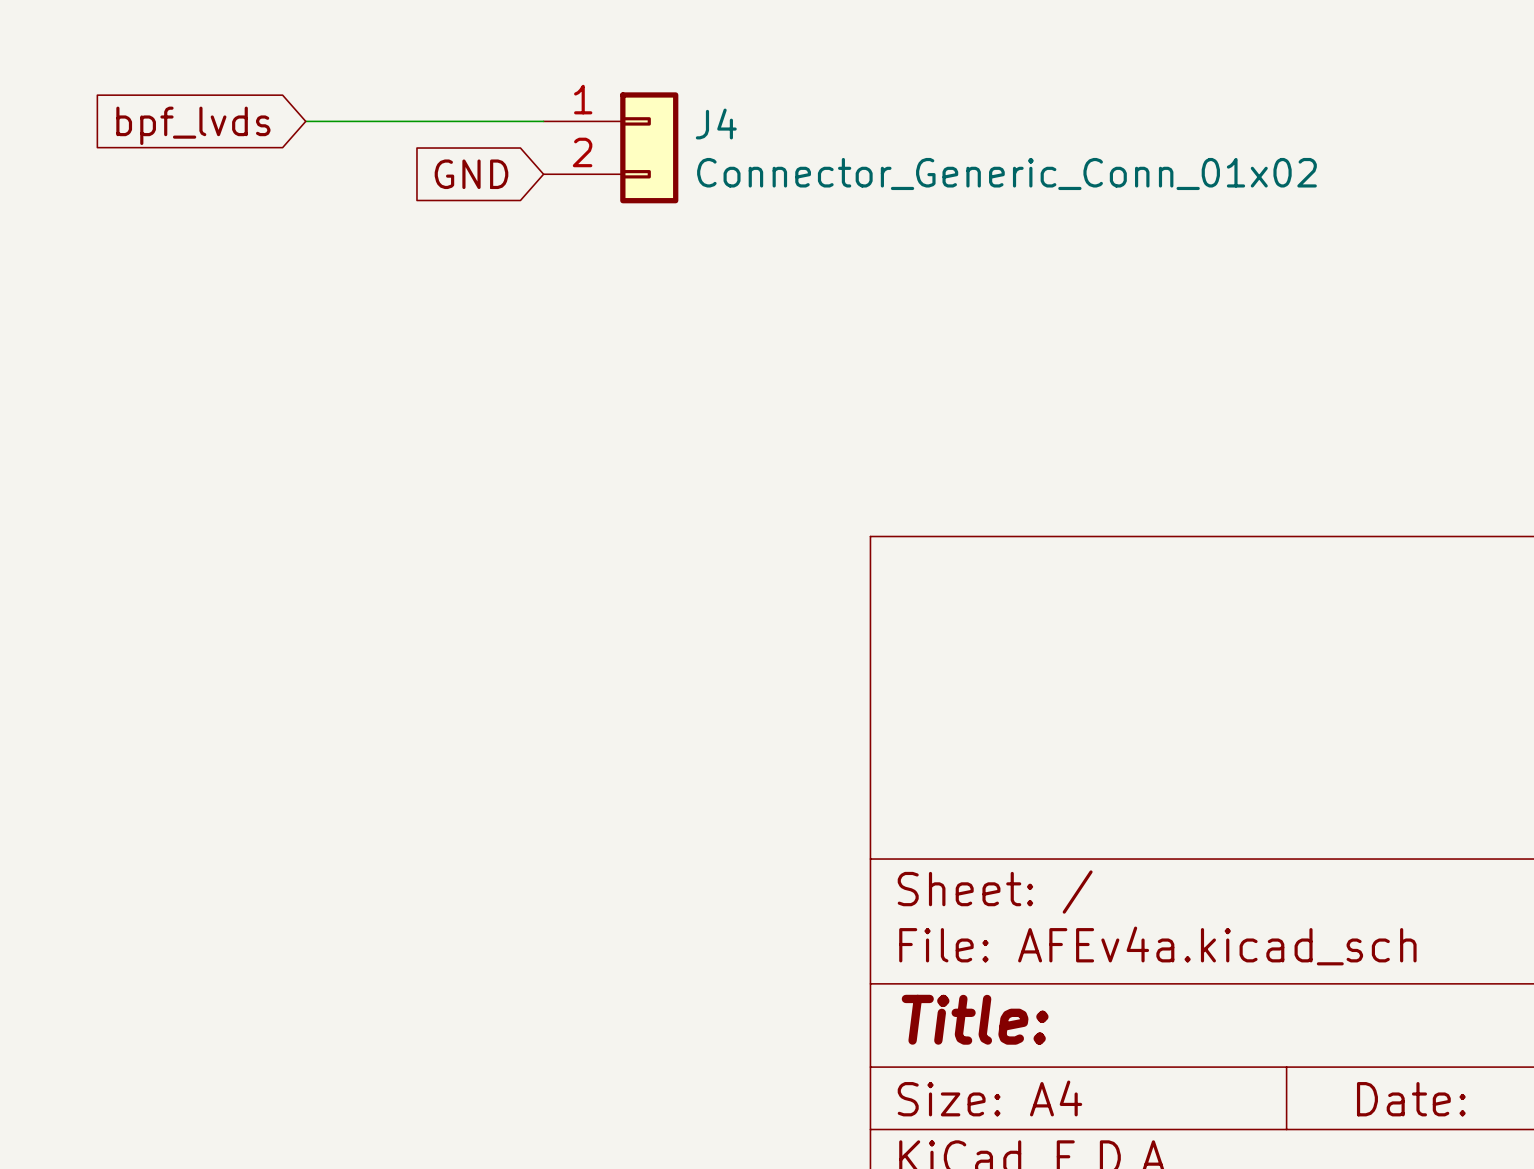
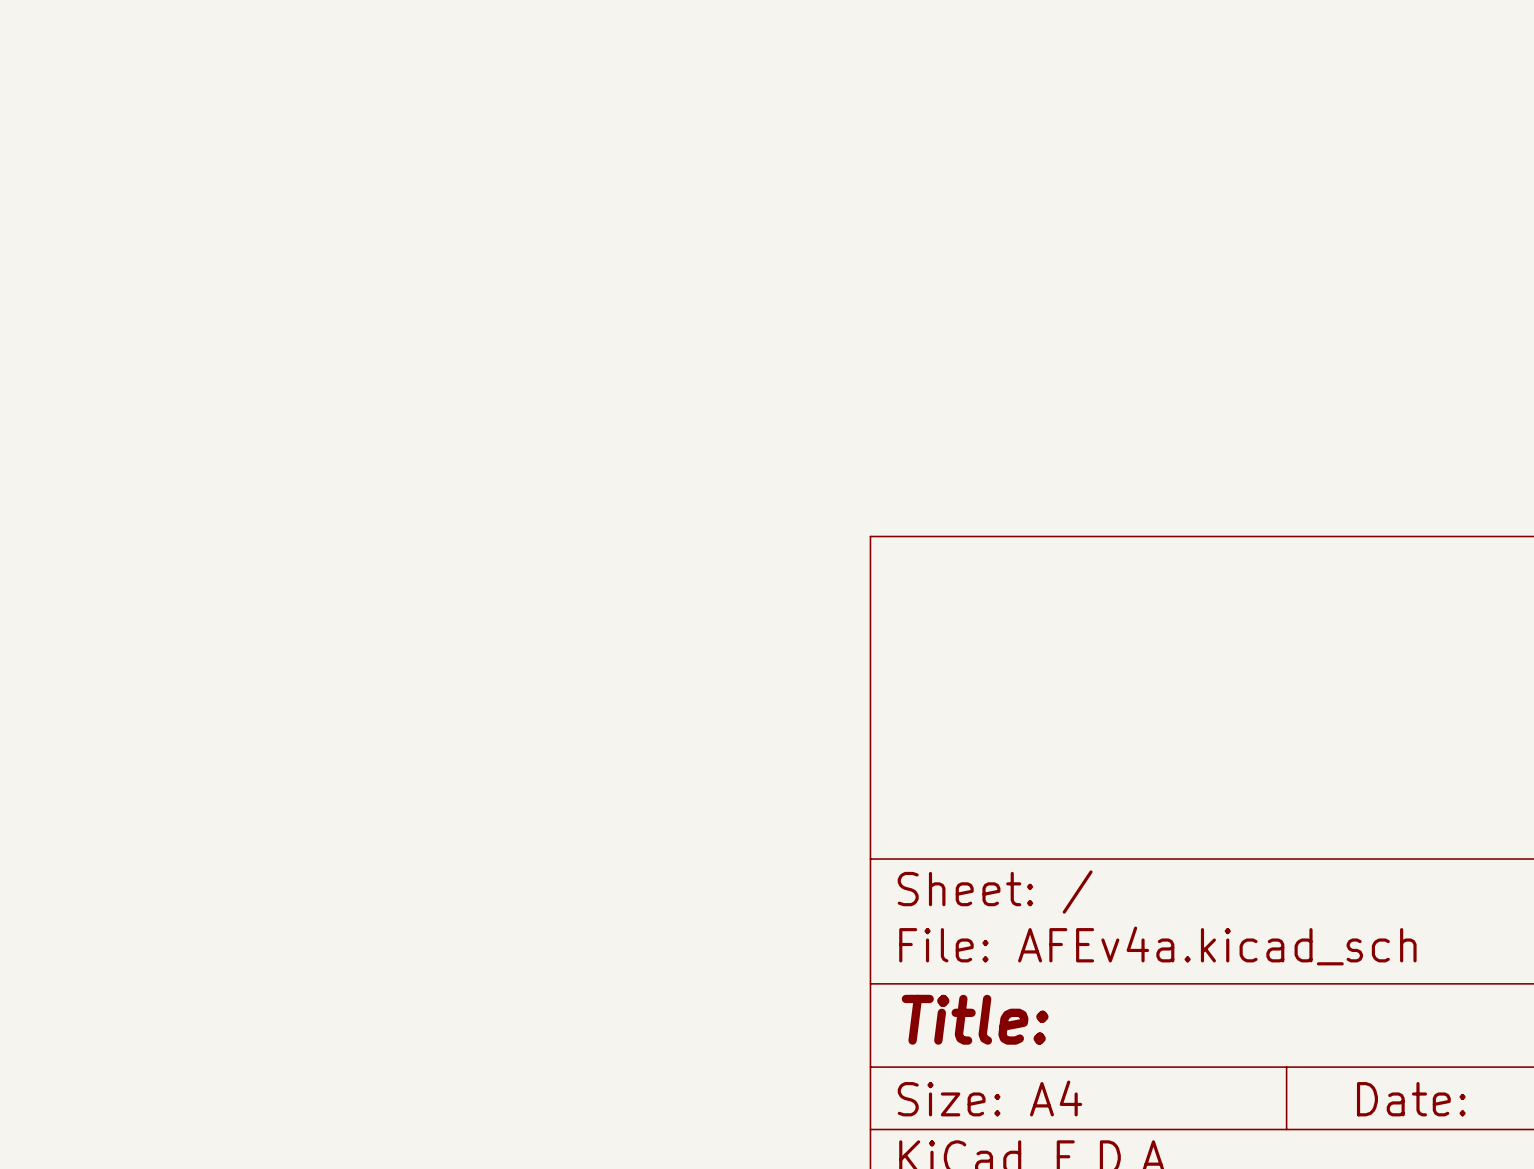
wire: (305, 121) (543, 121) -> none
global label: bpf_lvds (193, 125) -> none
J4: Connector_Generic_Conn_01x02 (610, 147) -> none
global label: GND (471, 174) -> none

